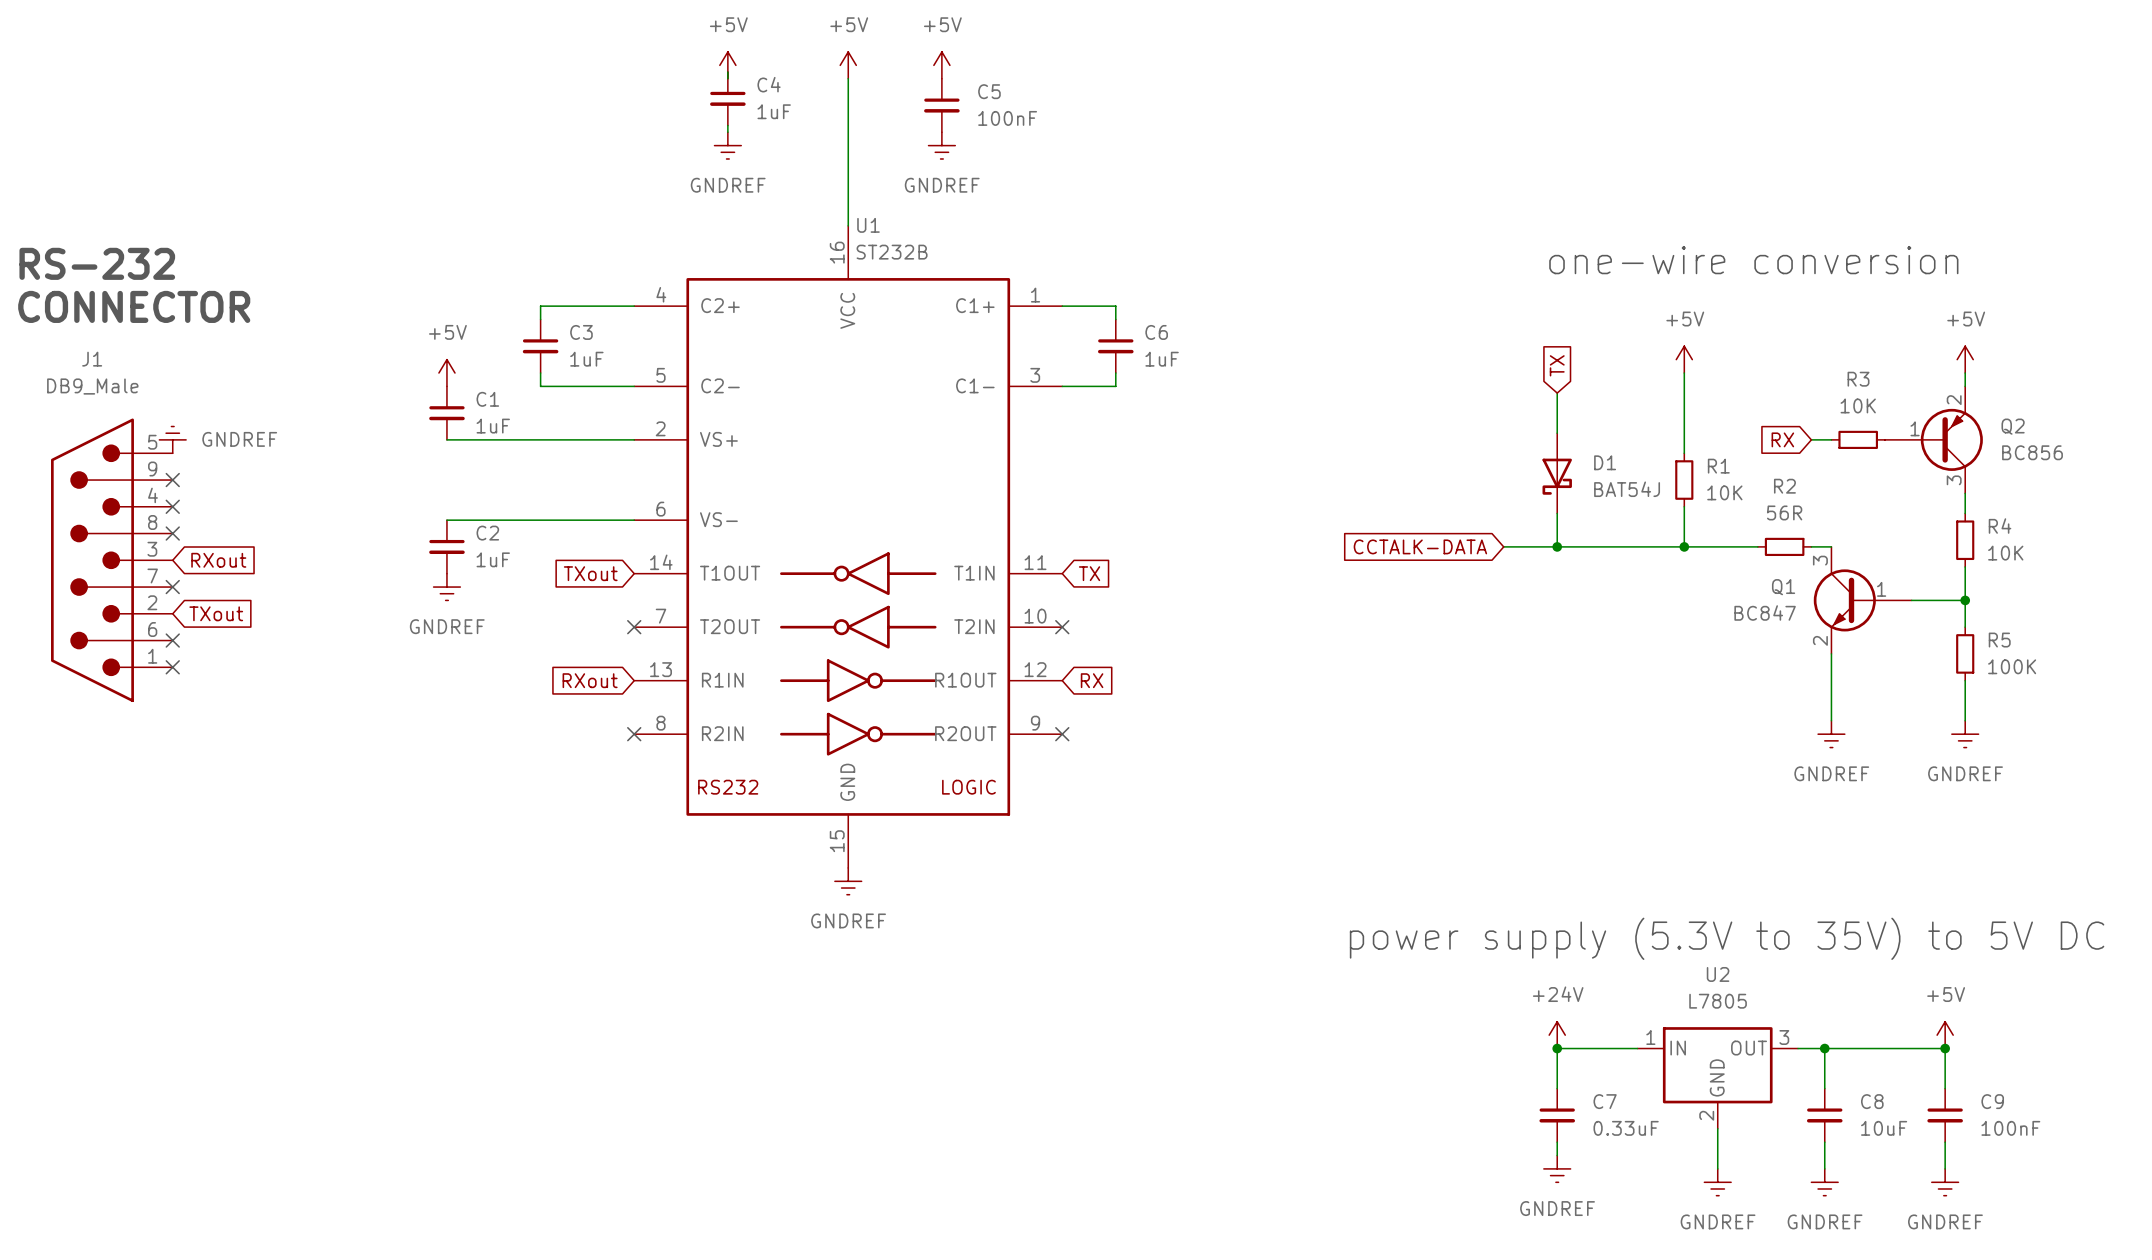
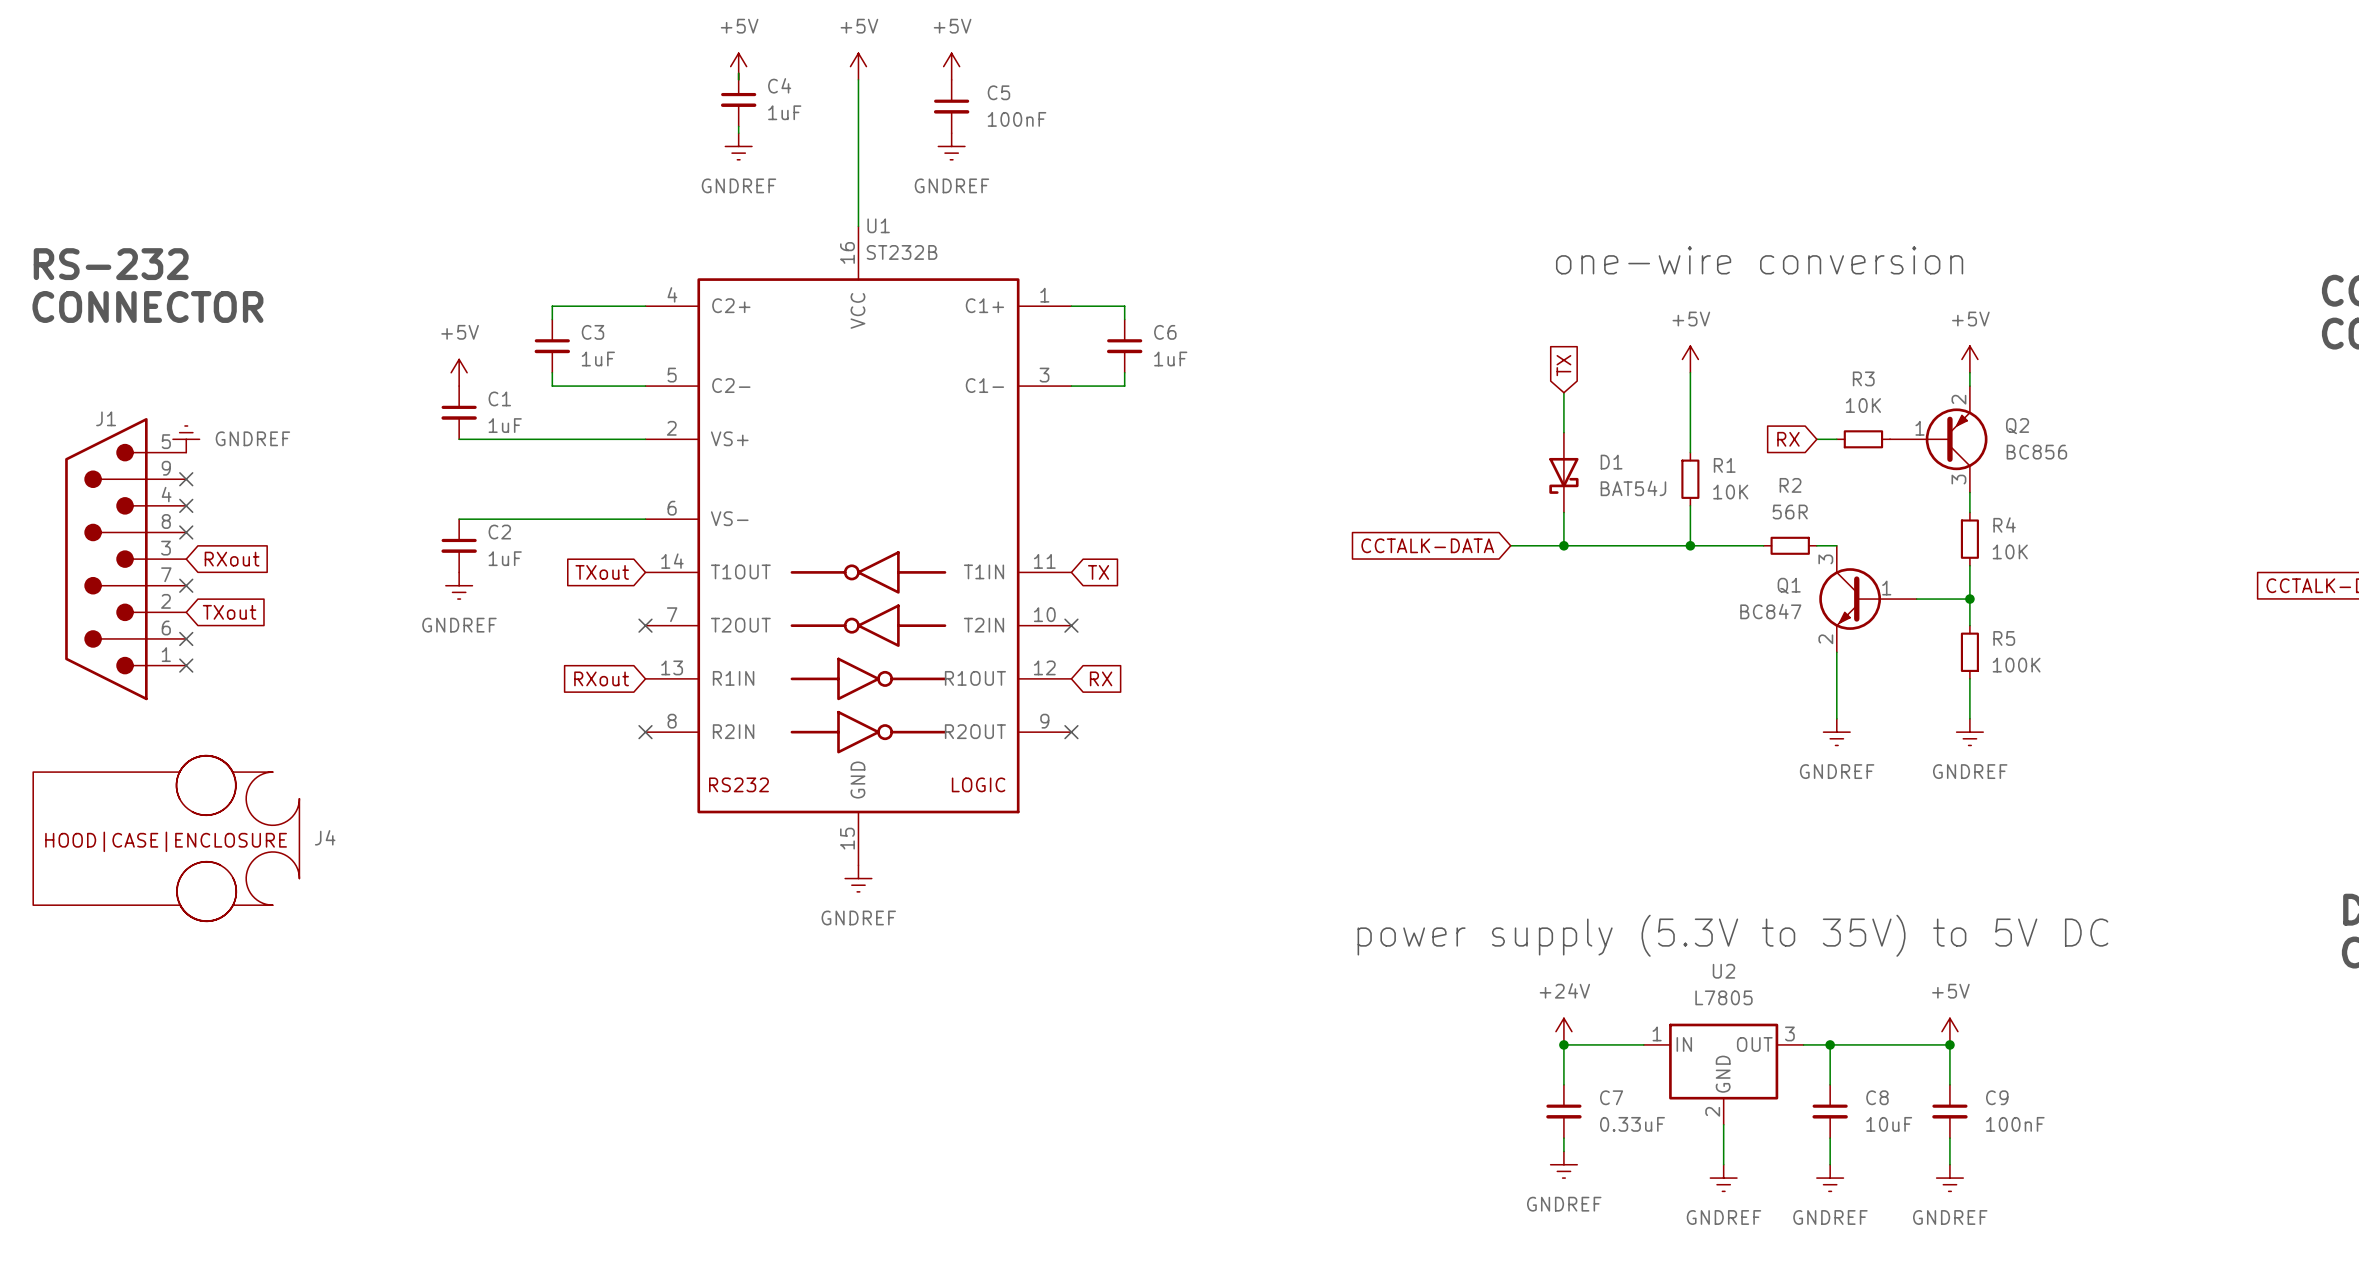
J1 name position: J1 (92, 359) -> J1 (106, 418)
J1 value: DB9_Male (92, 386) -> none
J4: none -> (166, 838)

